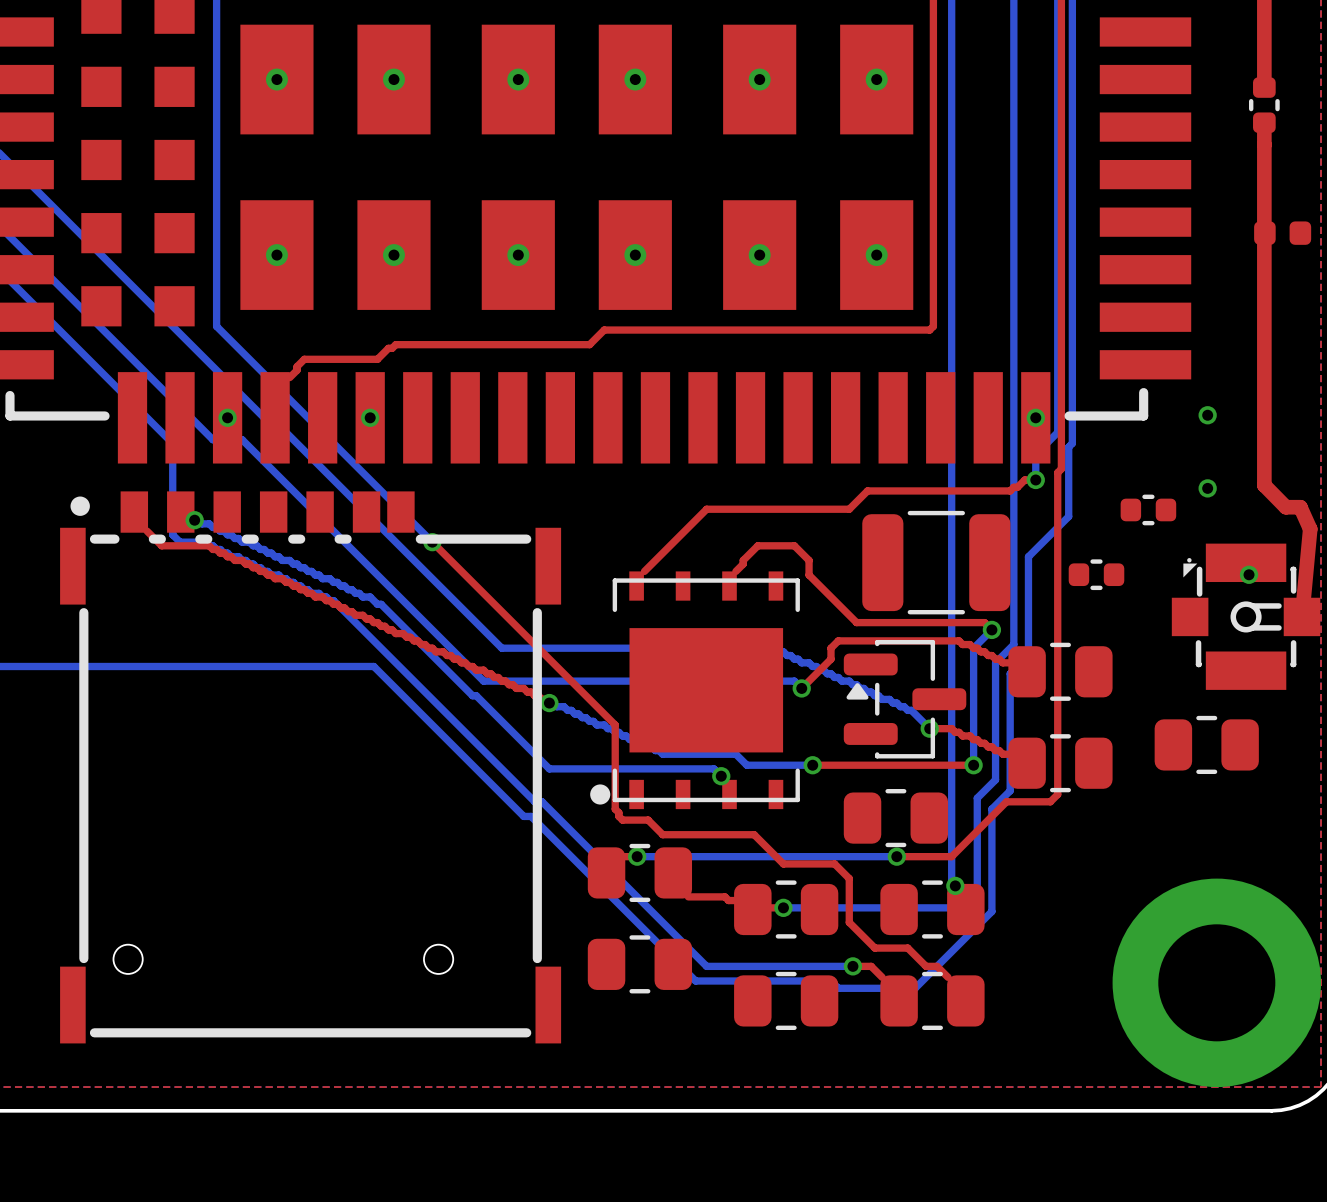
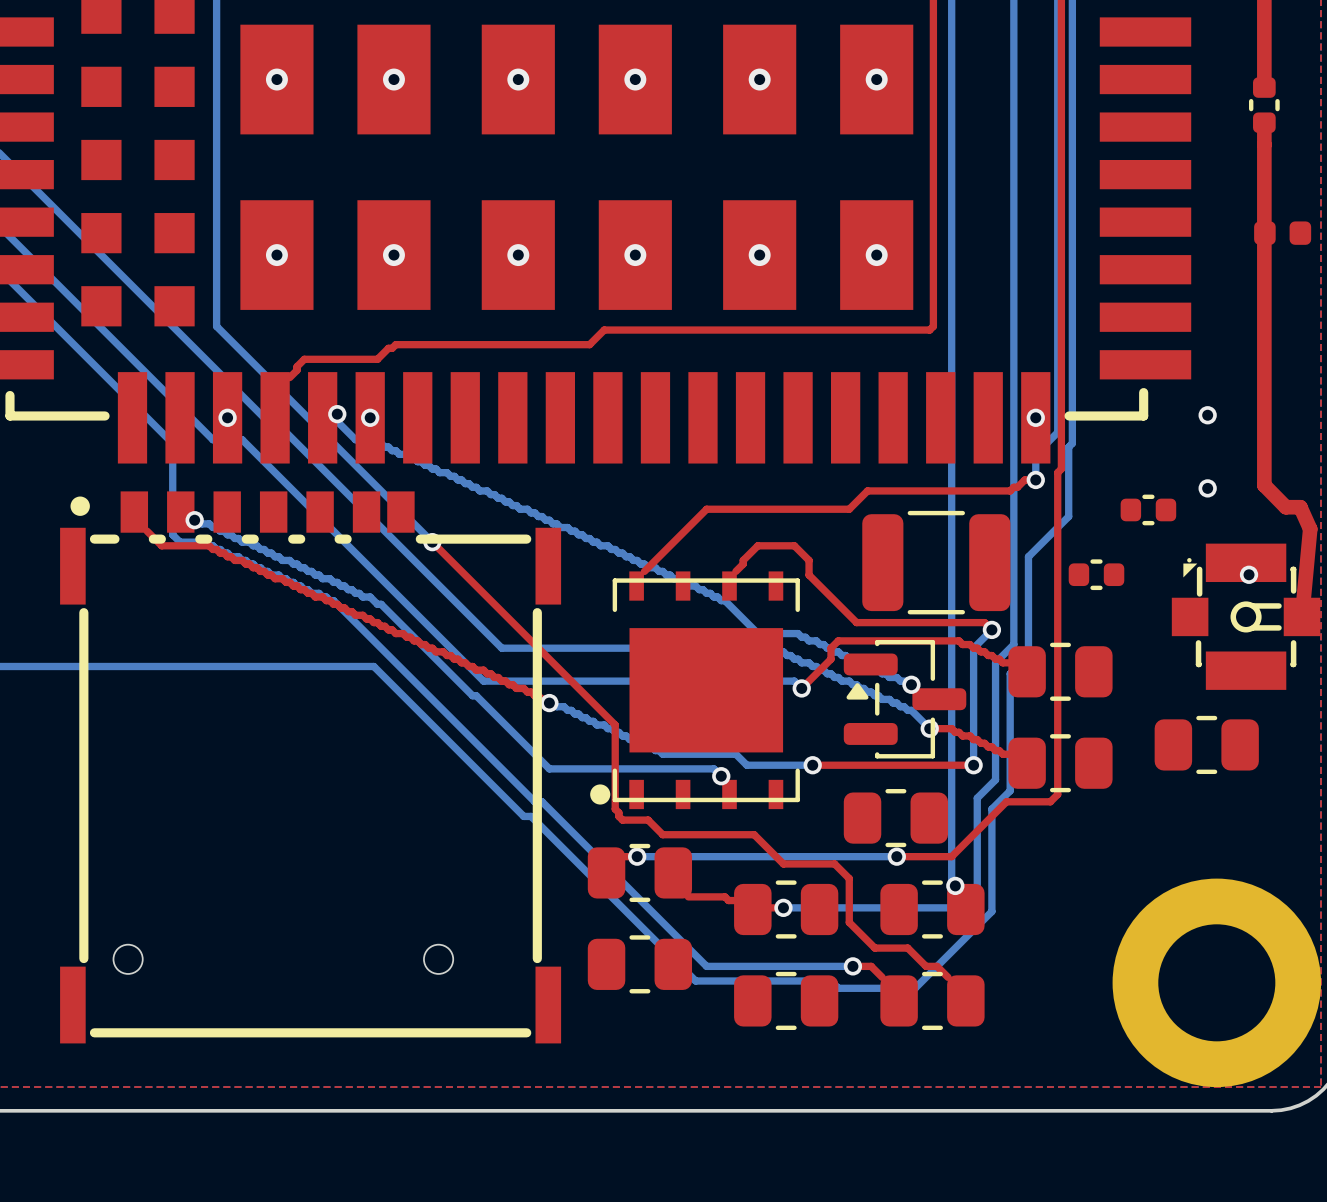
bottom track: none -> (337, 414) (337, 421) (355, 439) (373, 439) (377, 443) (381, 443) (399, 454) (406, 454) (439, 472) (447, 472) (479, 490) (487, 490) (520, 509) (527, 509) (560, 527) (567, 527) (600, 545) (607, 545) (648, 567) (655, 567) (688, 586) (695, 586) (699, 589) (724, 600) (757, 633) (798, 633) (809, 640) (816, 640) (849, 659) (856, 659) (889, 677) (896, 677) (900, 681) (907, 681) (911, 684)
via: none -> (337, 414)
via: none -> (911, 684)

